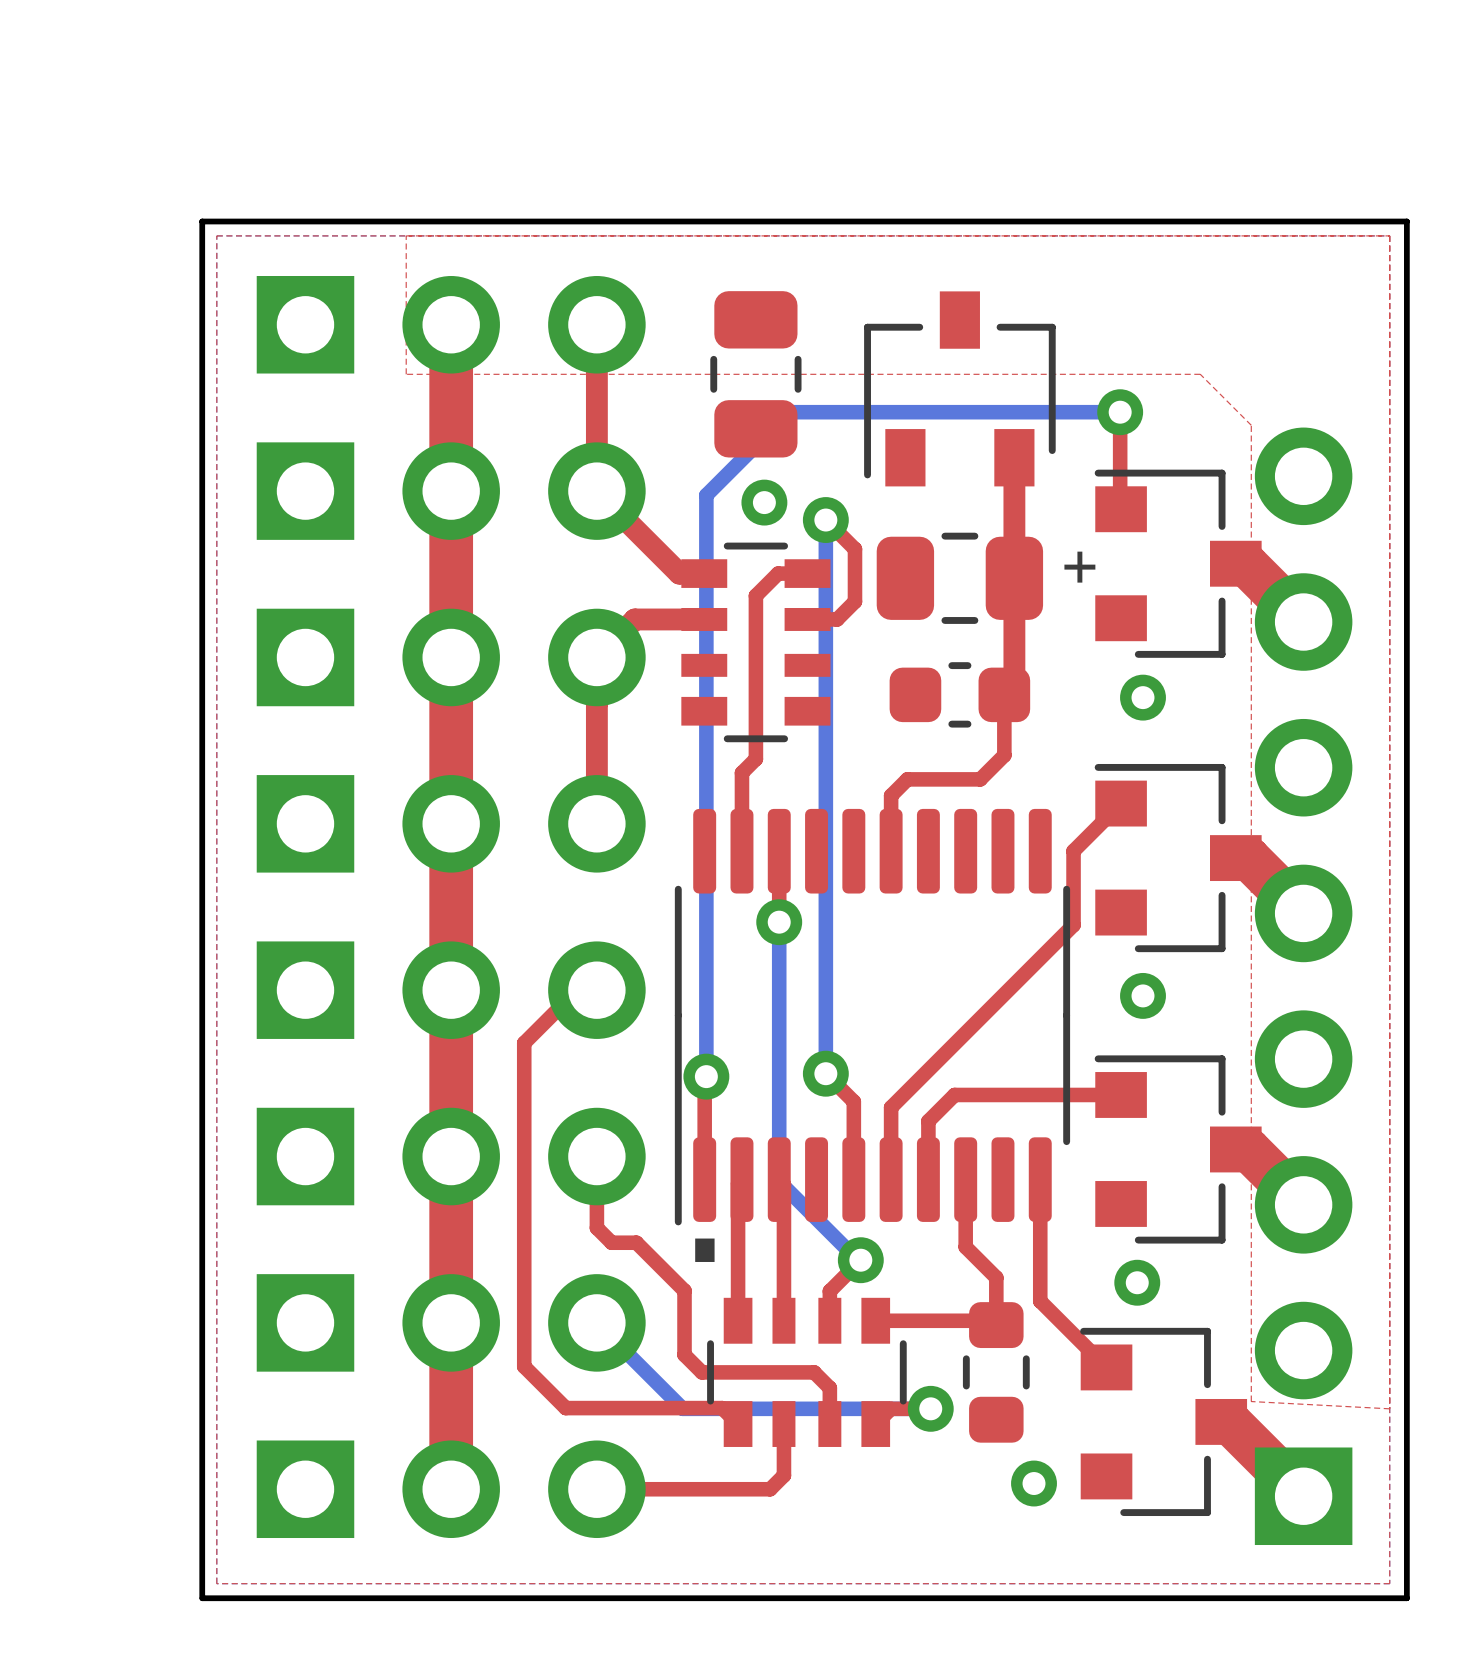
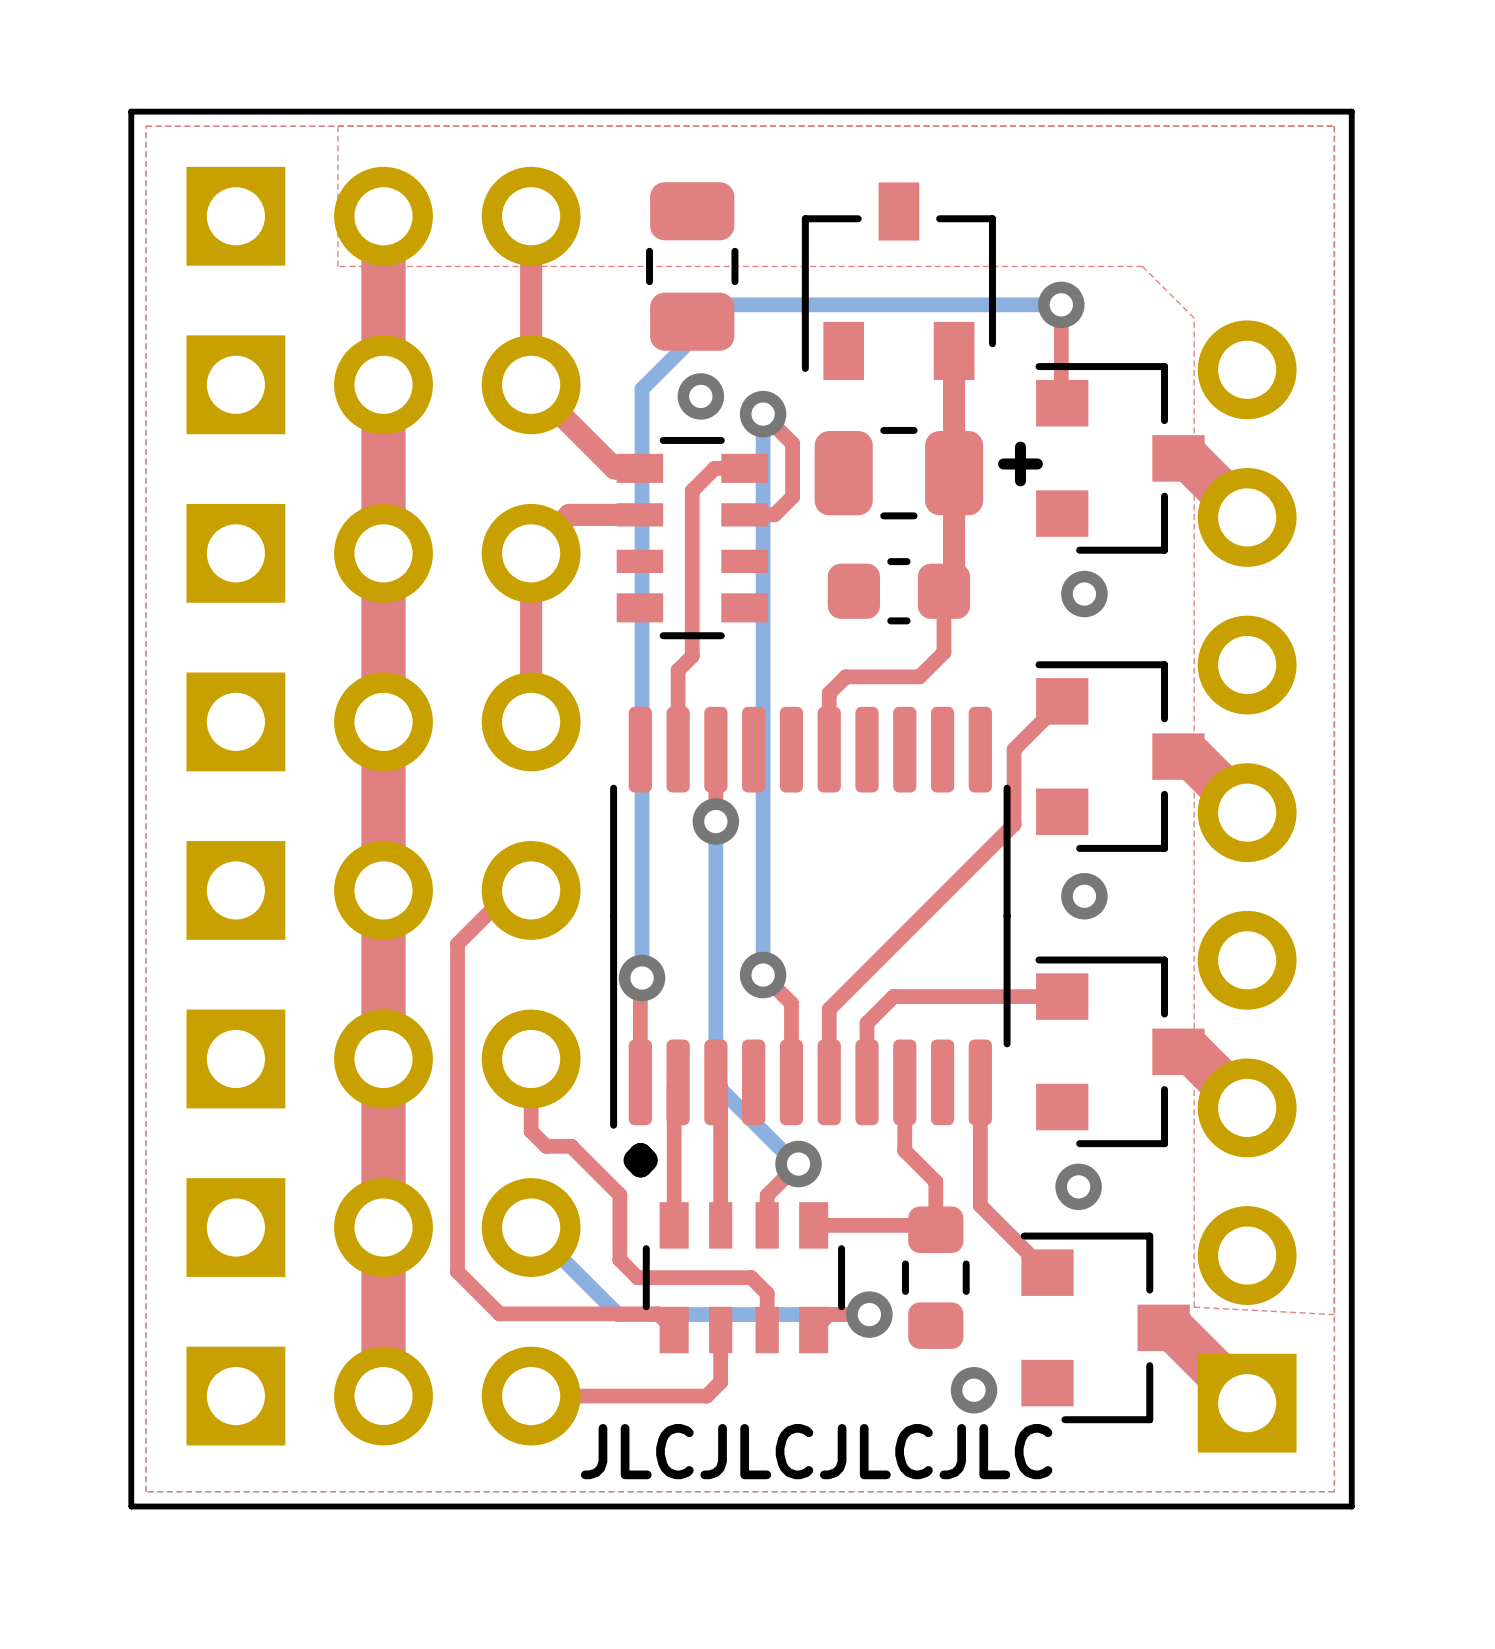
text: none -> JLCJLCJLCJLC (816, 1451)

